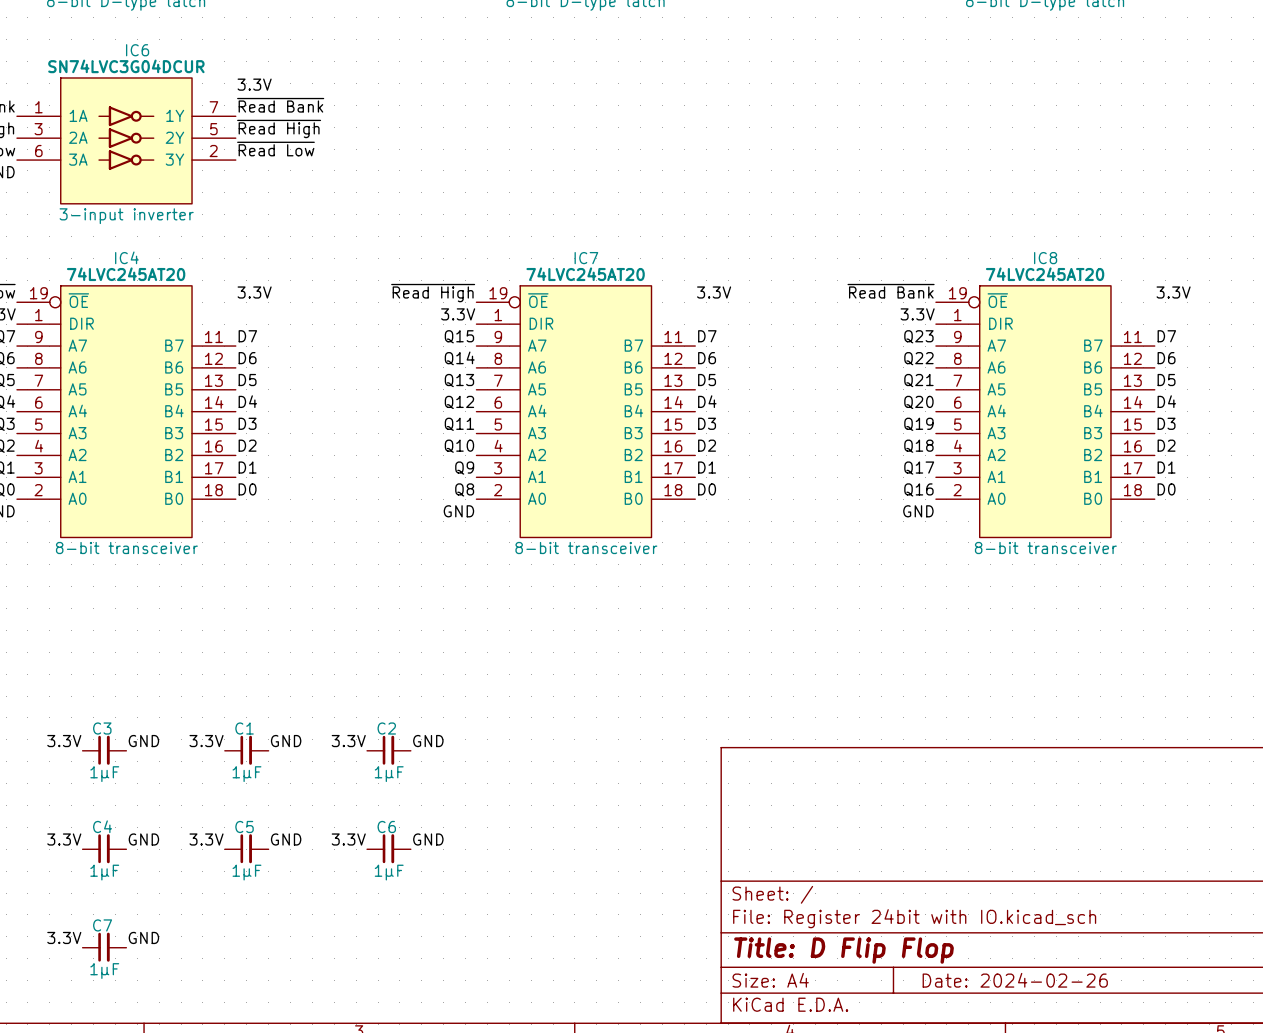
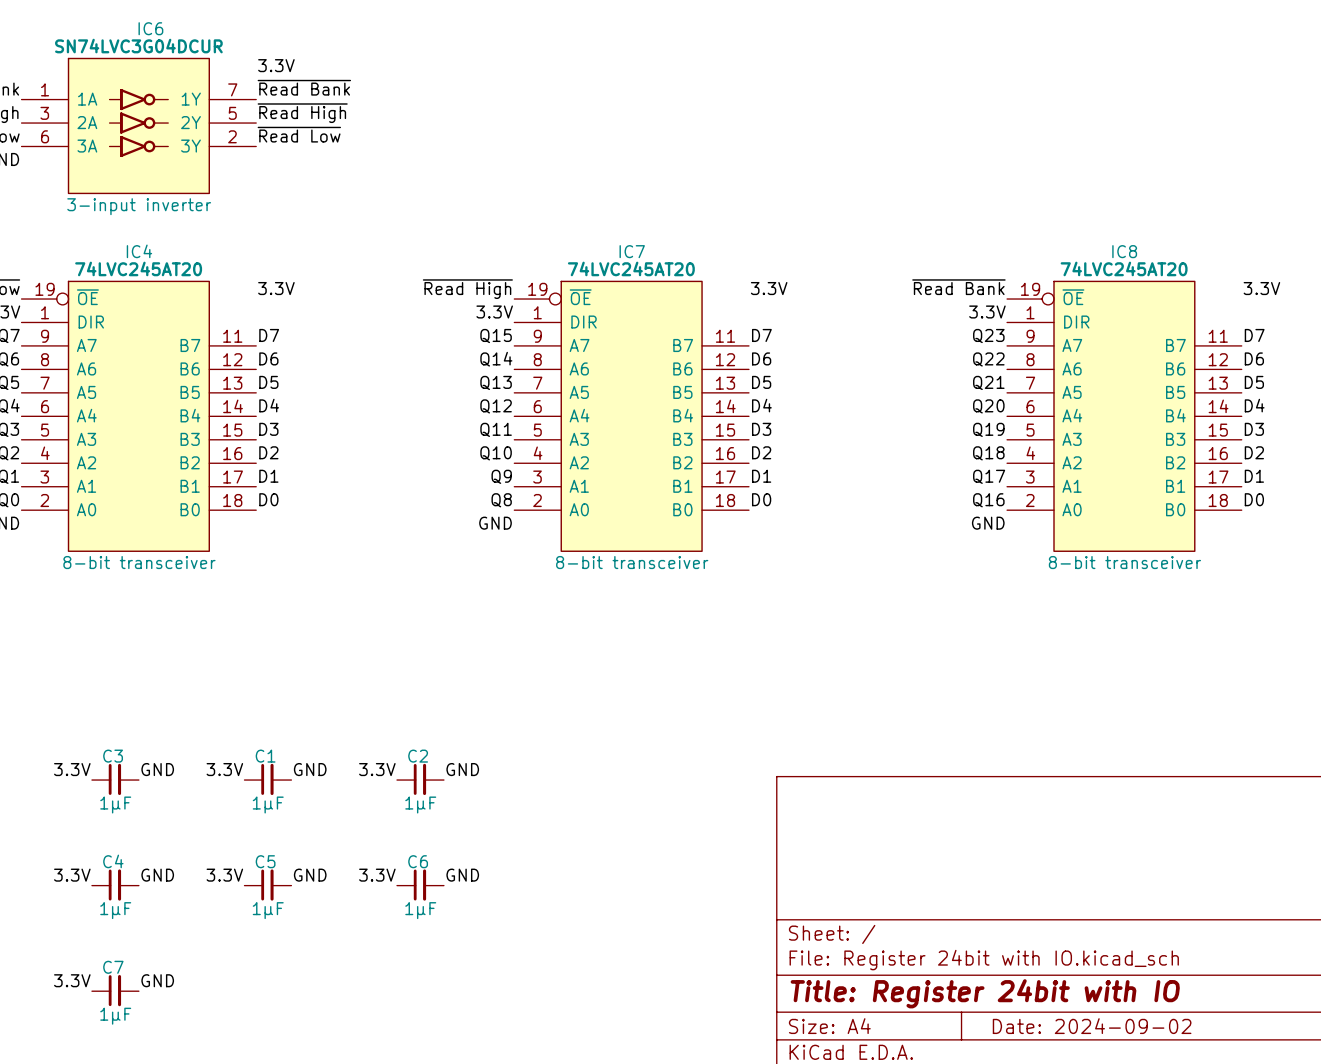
title block: Title: D Flip Flop (844, 950) -> Title: Register 24bit with IO (985, 993)
title block: Date: 2024-02-26 (1015, 980) -> Date: 2024-09-02 (1092, 1026)

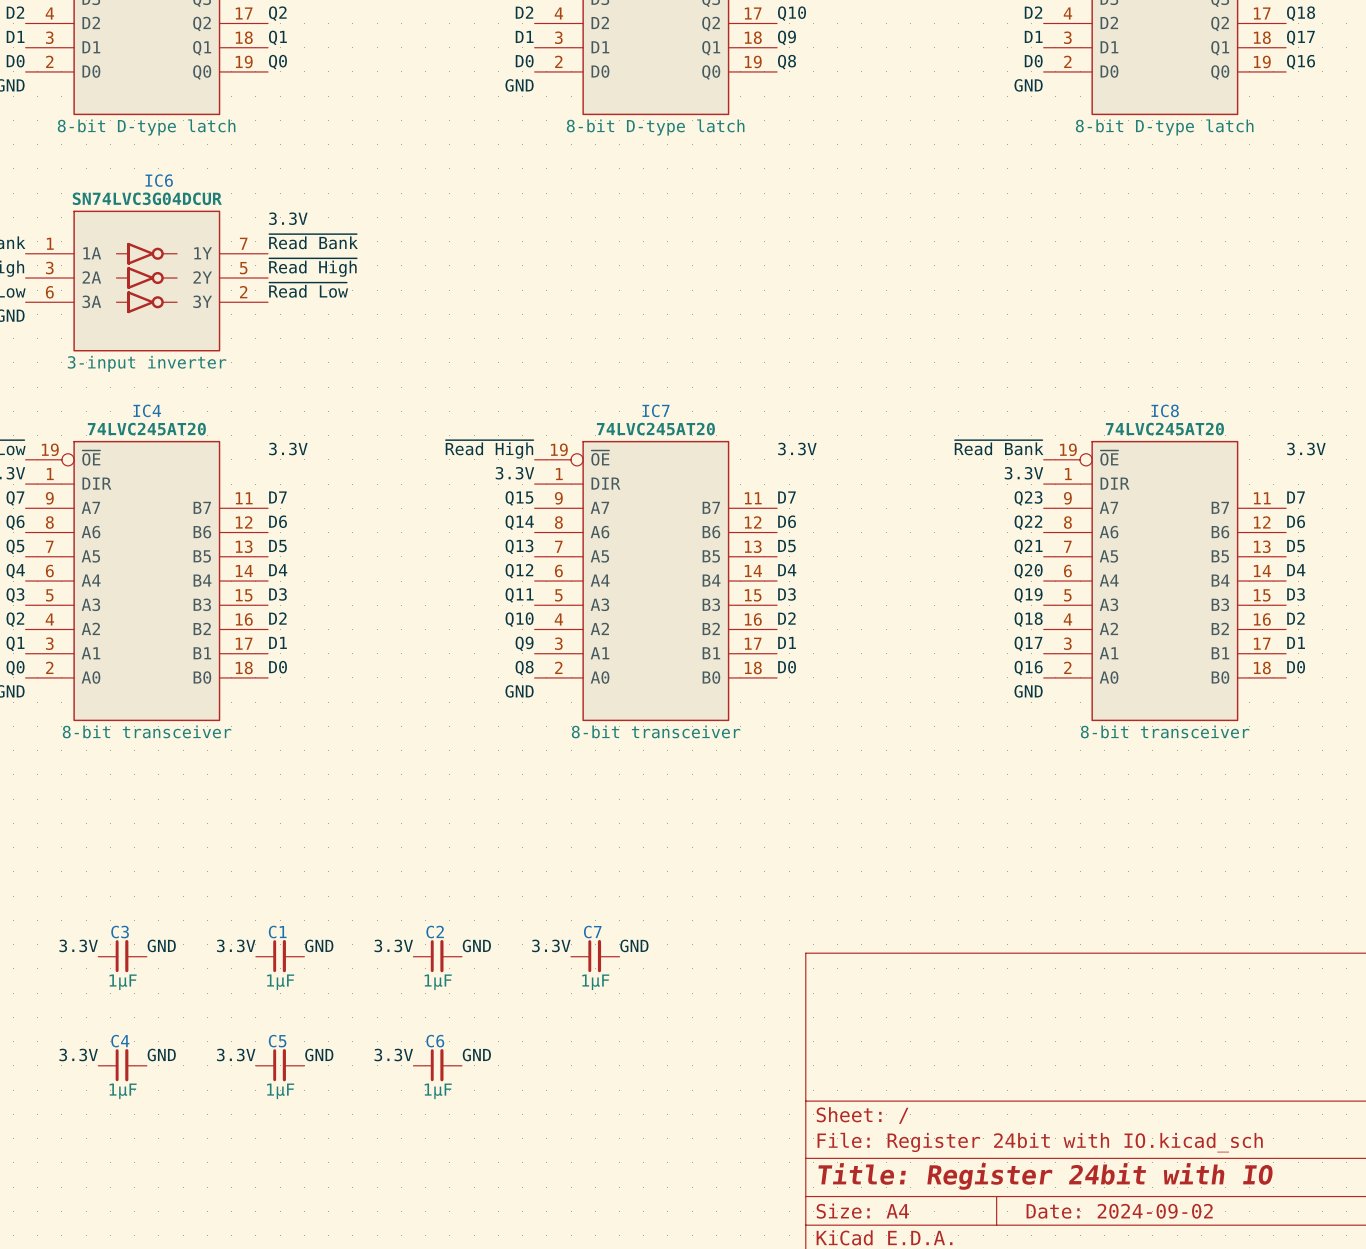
label: none -> 3.3V (551, 945)
label: none -> GND (634, 945)
label: 3.3V (72, 980) -> none
label: GND (157, 980) -> none
C7 position: (115, 990) -> (595, 956)

